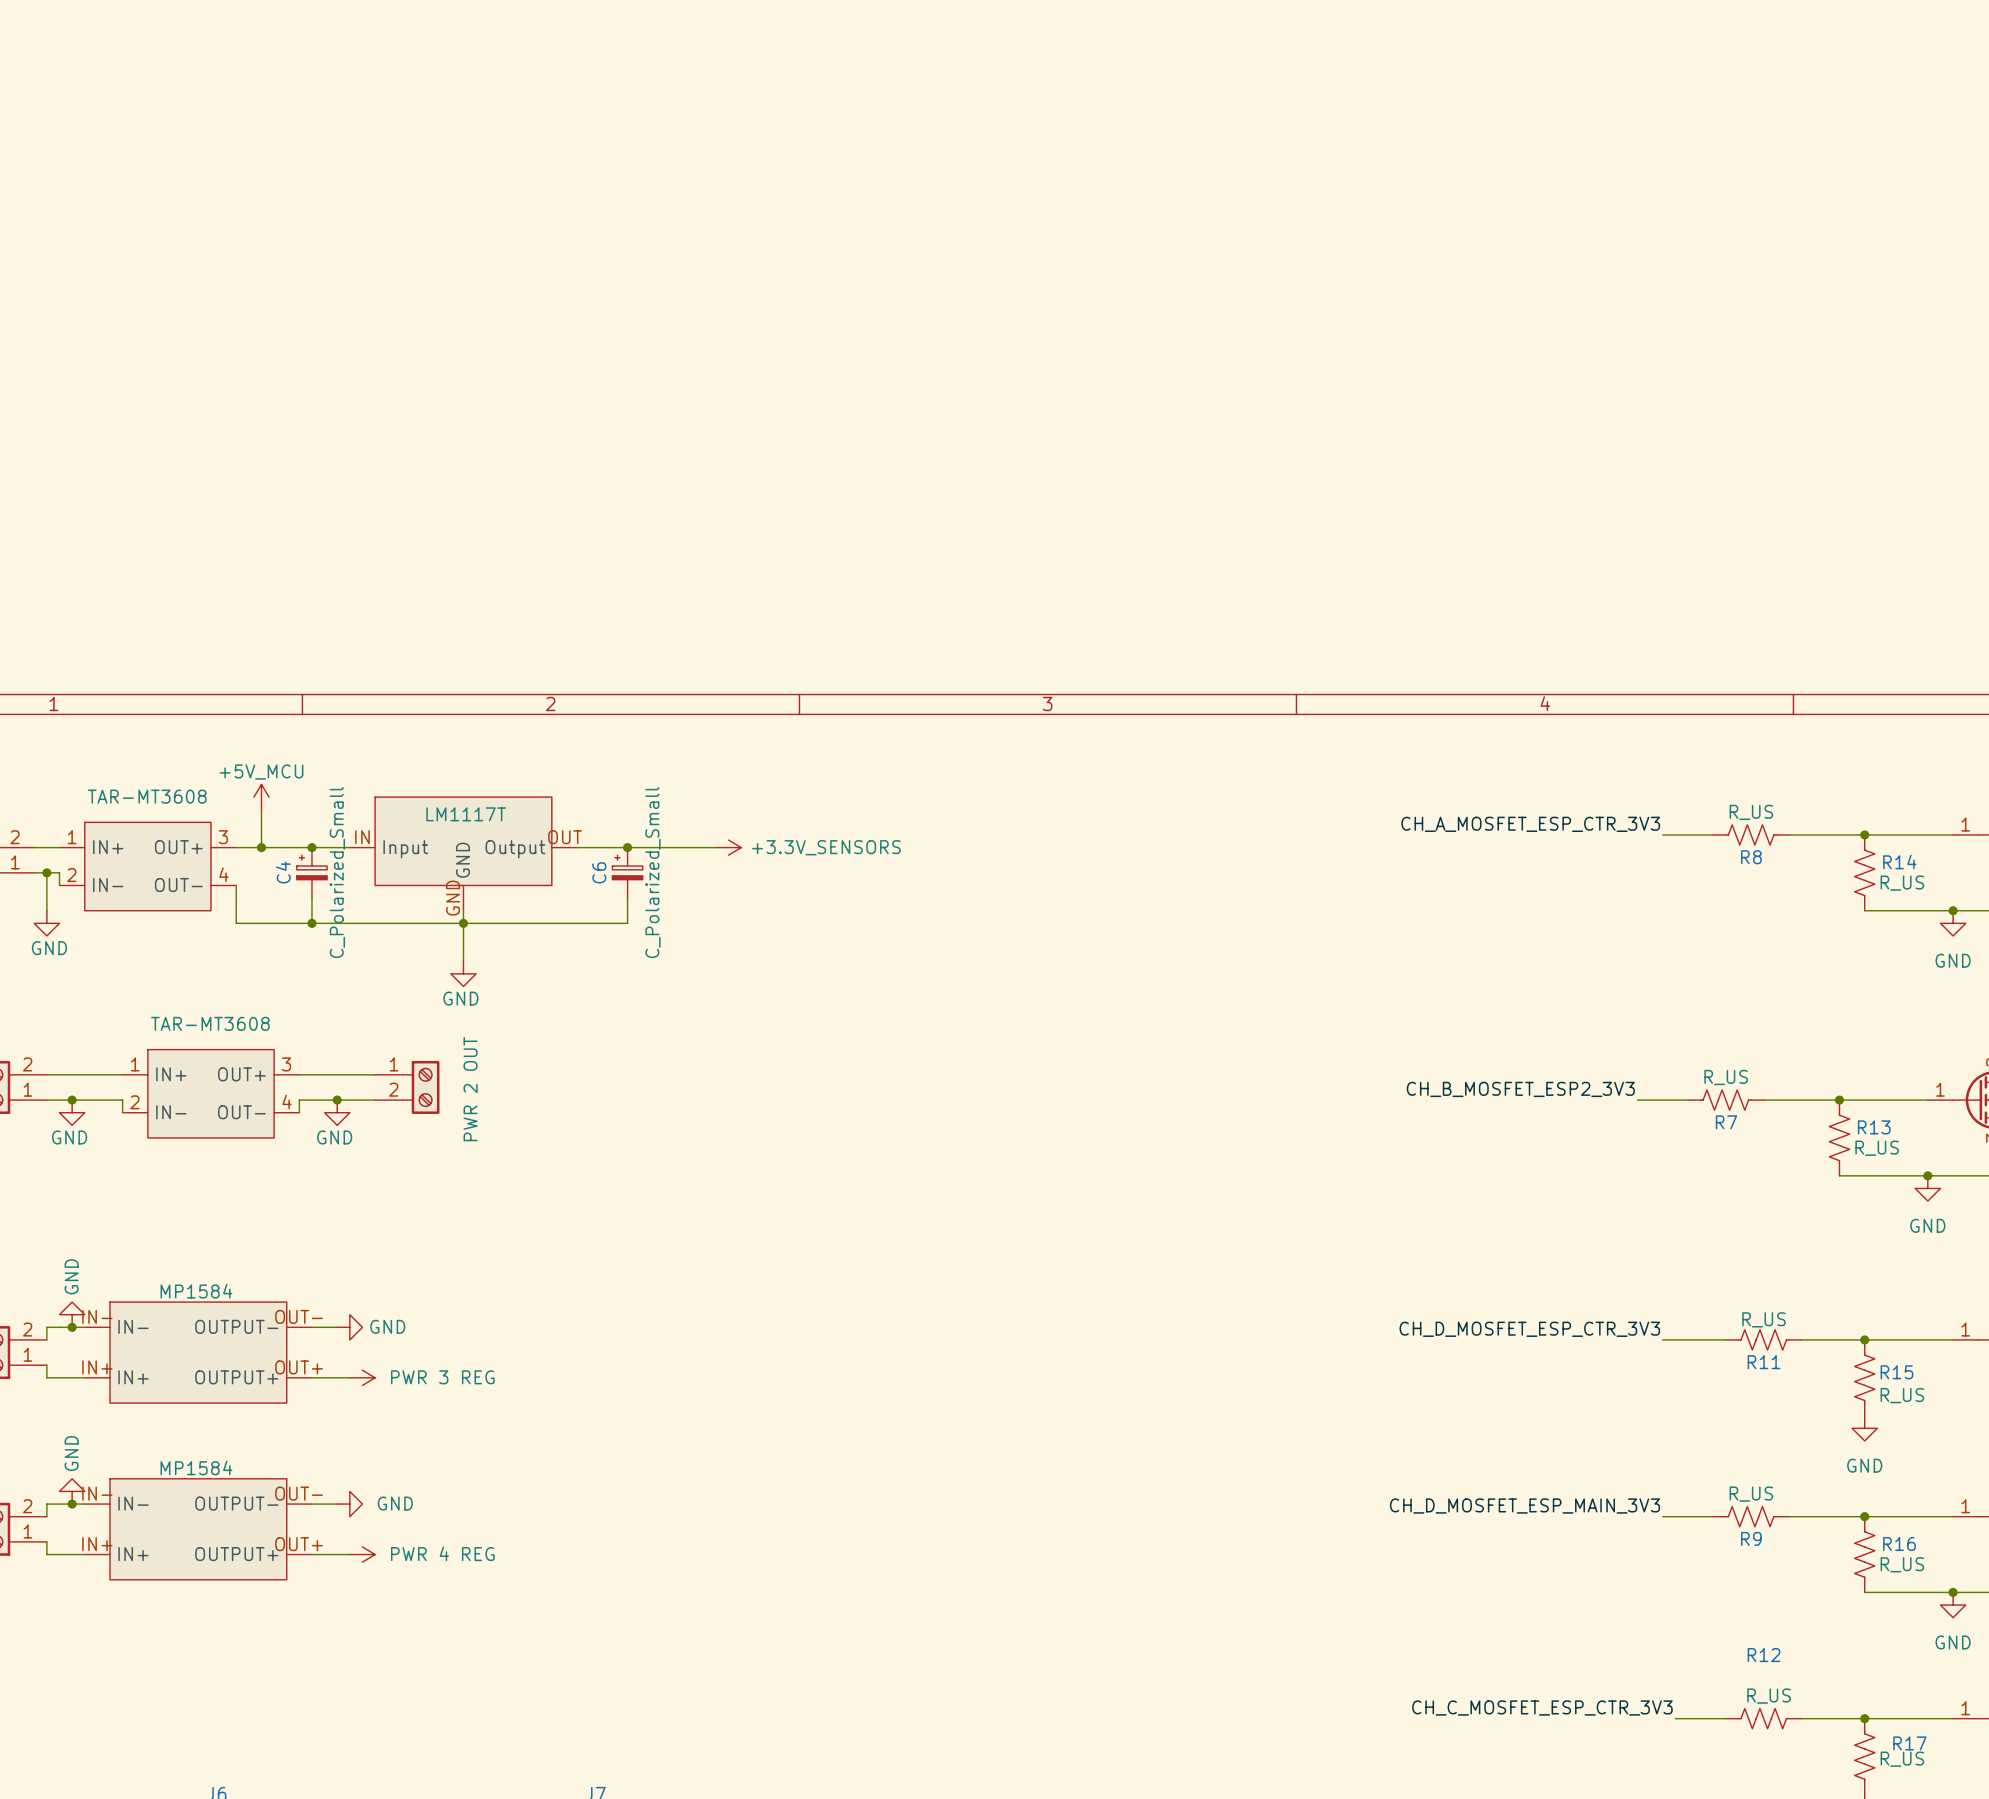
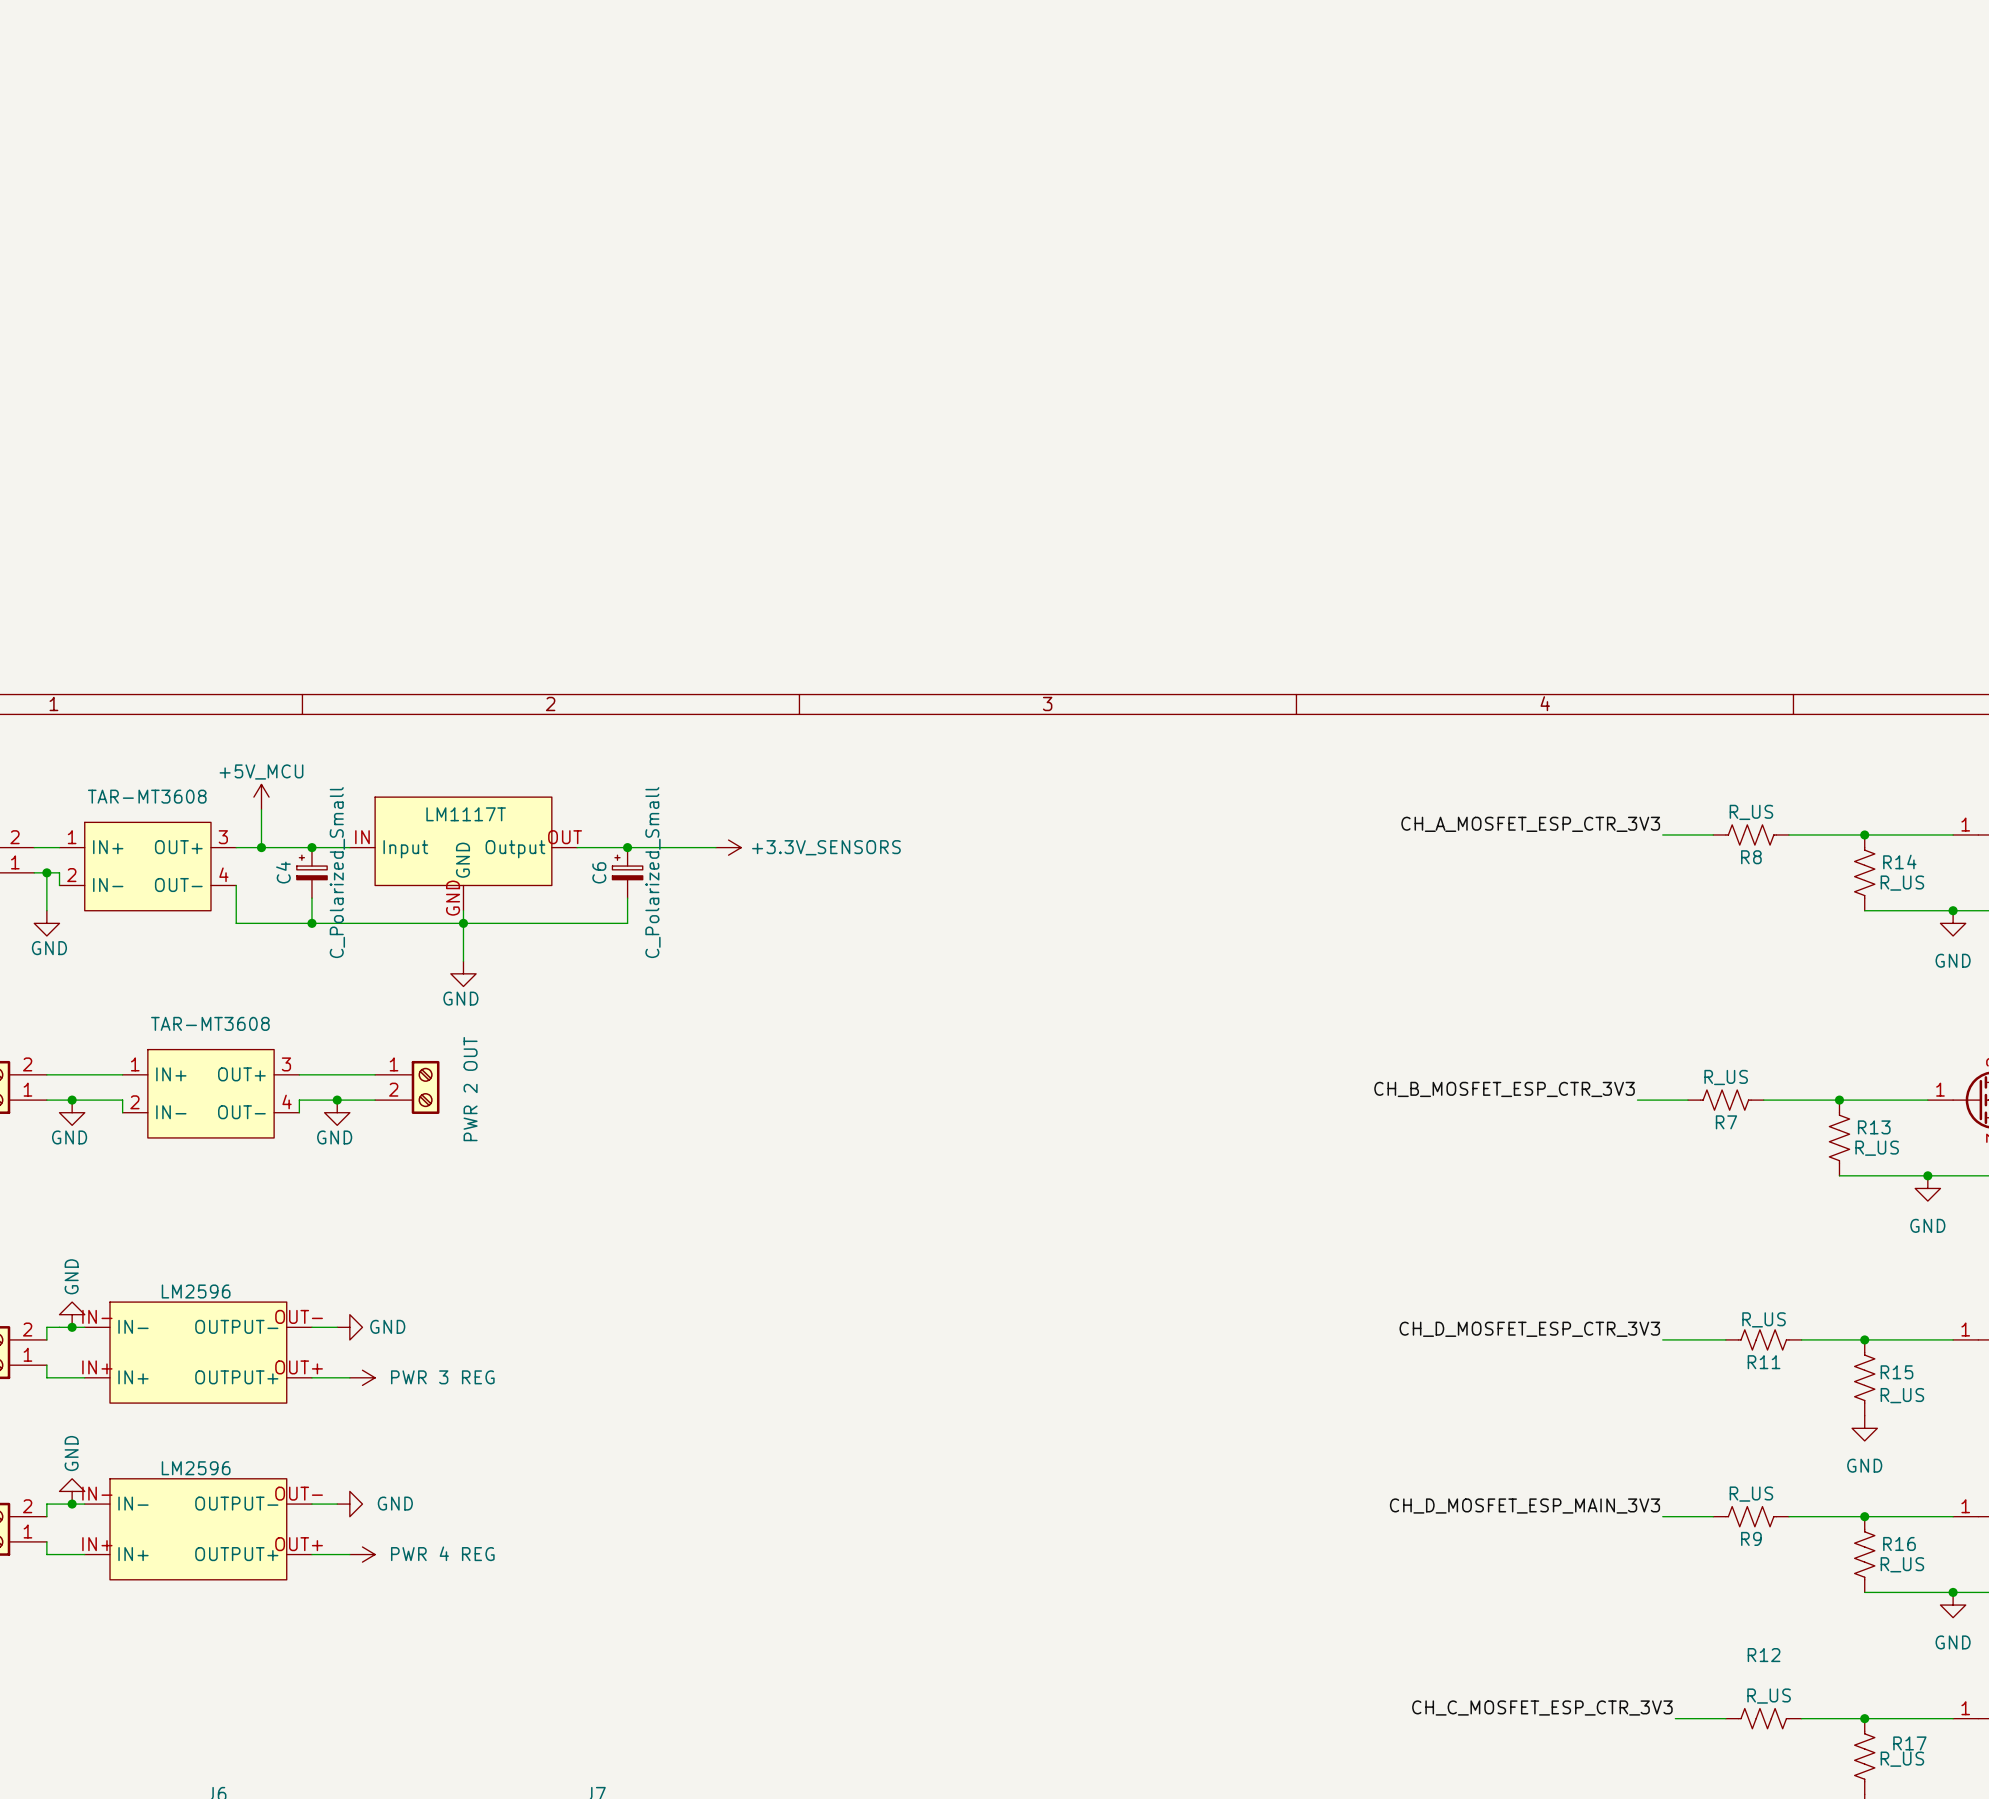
label: CH_B_MOSFET_ESP2_3V3 (1520, 1089) -> CH_B_MOSFET_ESP_CTR_3V3 (1504, 1089)
part value: MP1584 (196, 1291) -> LM2596 (196, 1291)
part value: MP1584 (196, 1467) -> LM2596 (196, 1468)

